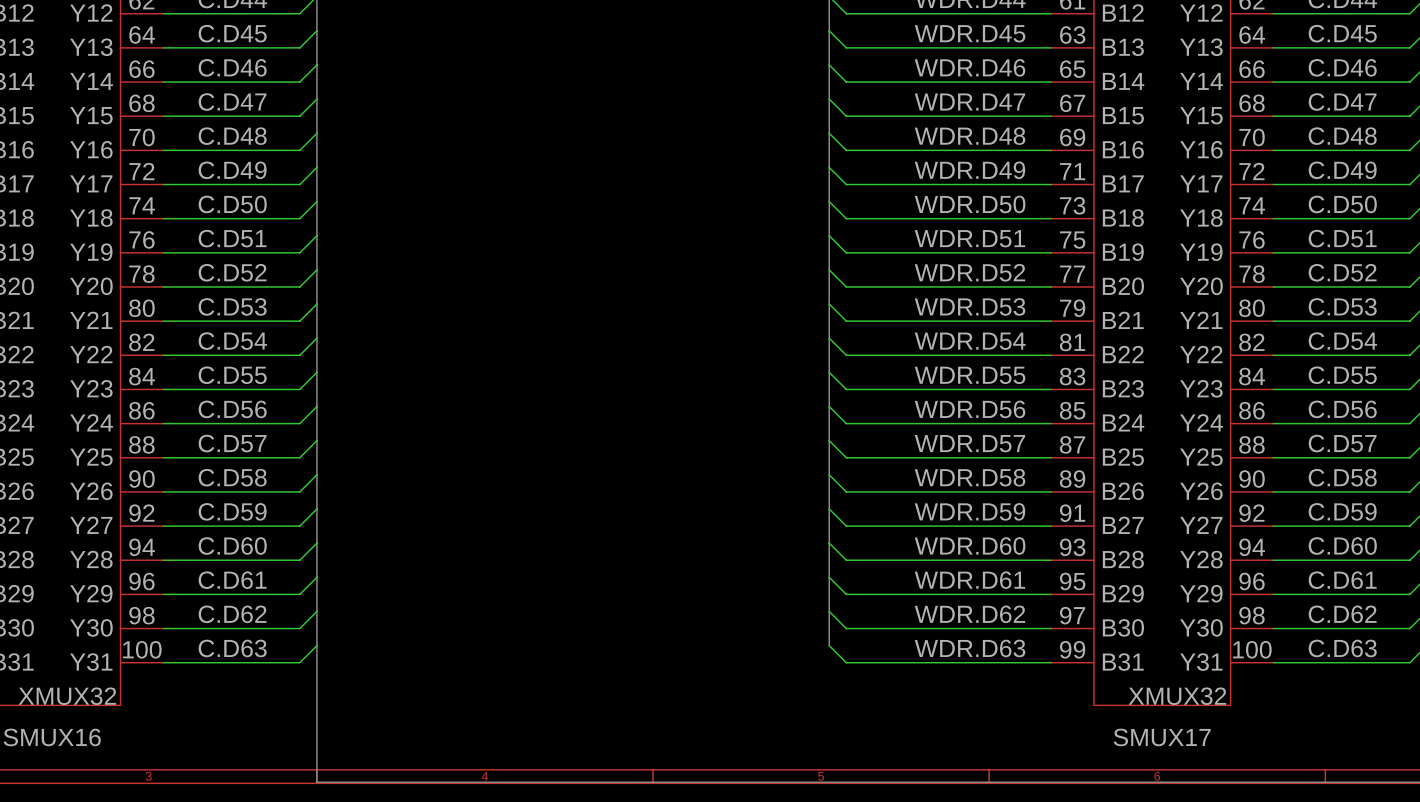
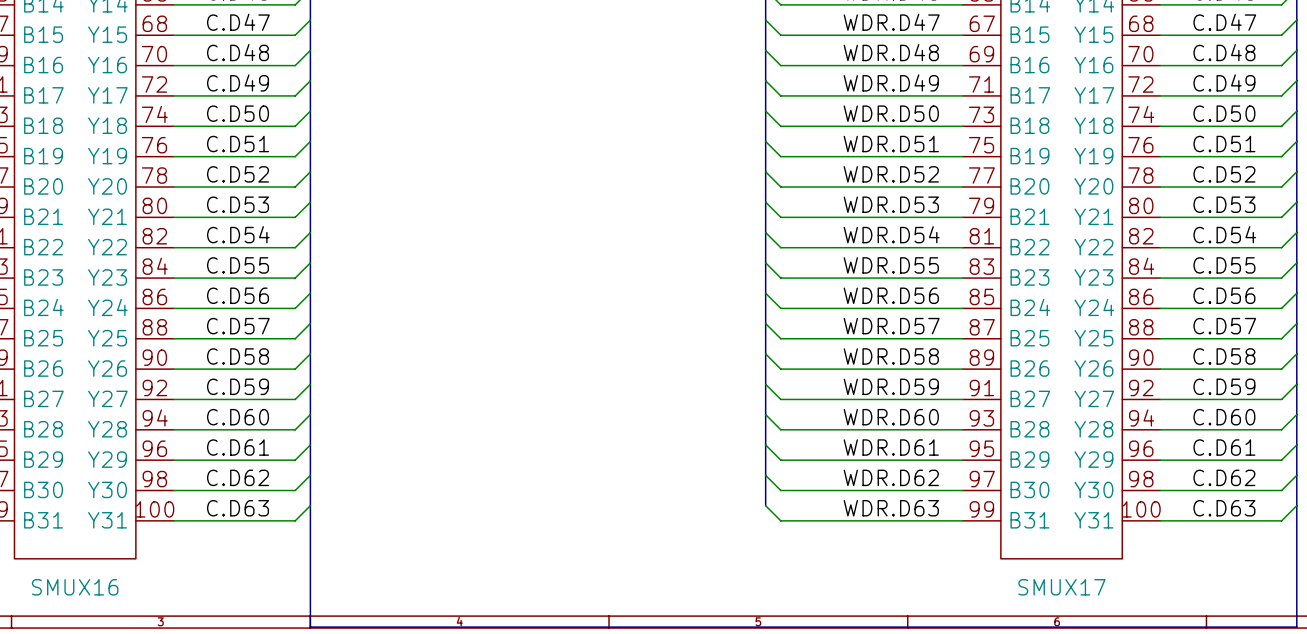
part value: XMUX32 (67, 696) -> none
part value: XMUX32 (1177, 696) -> none

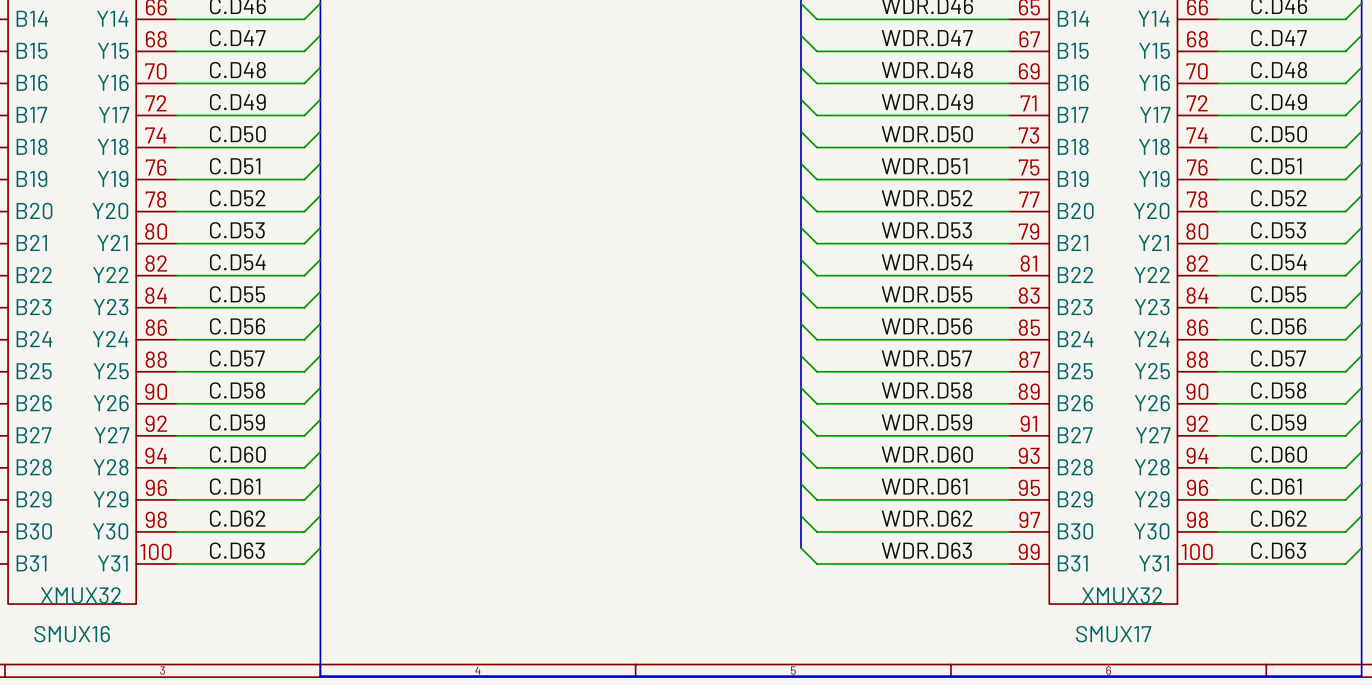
part value: none -> XMUX32 (80, 595)
part value: none -> XMUX32 (1122, 595)

